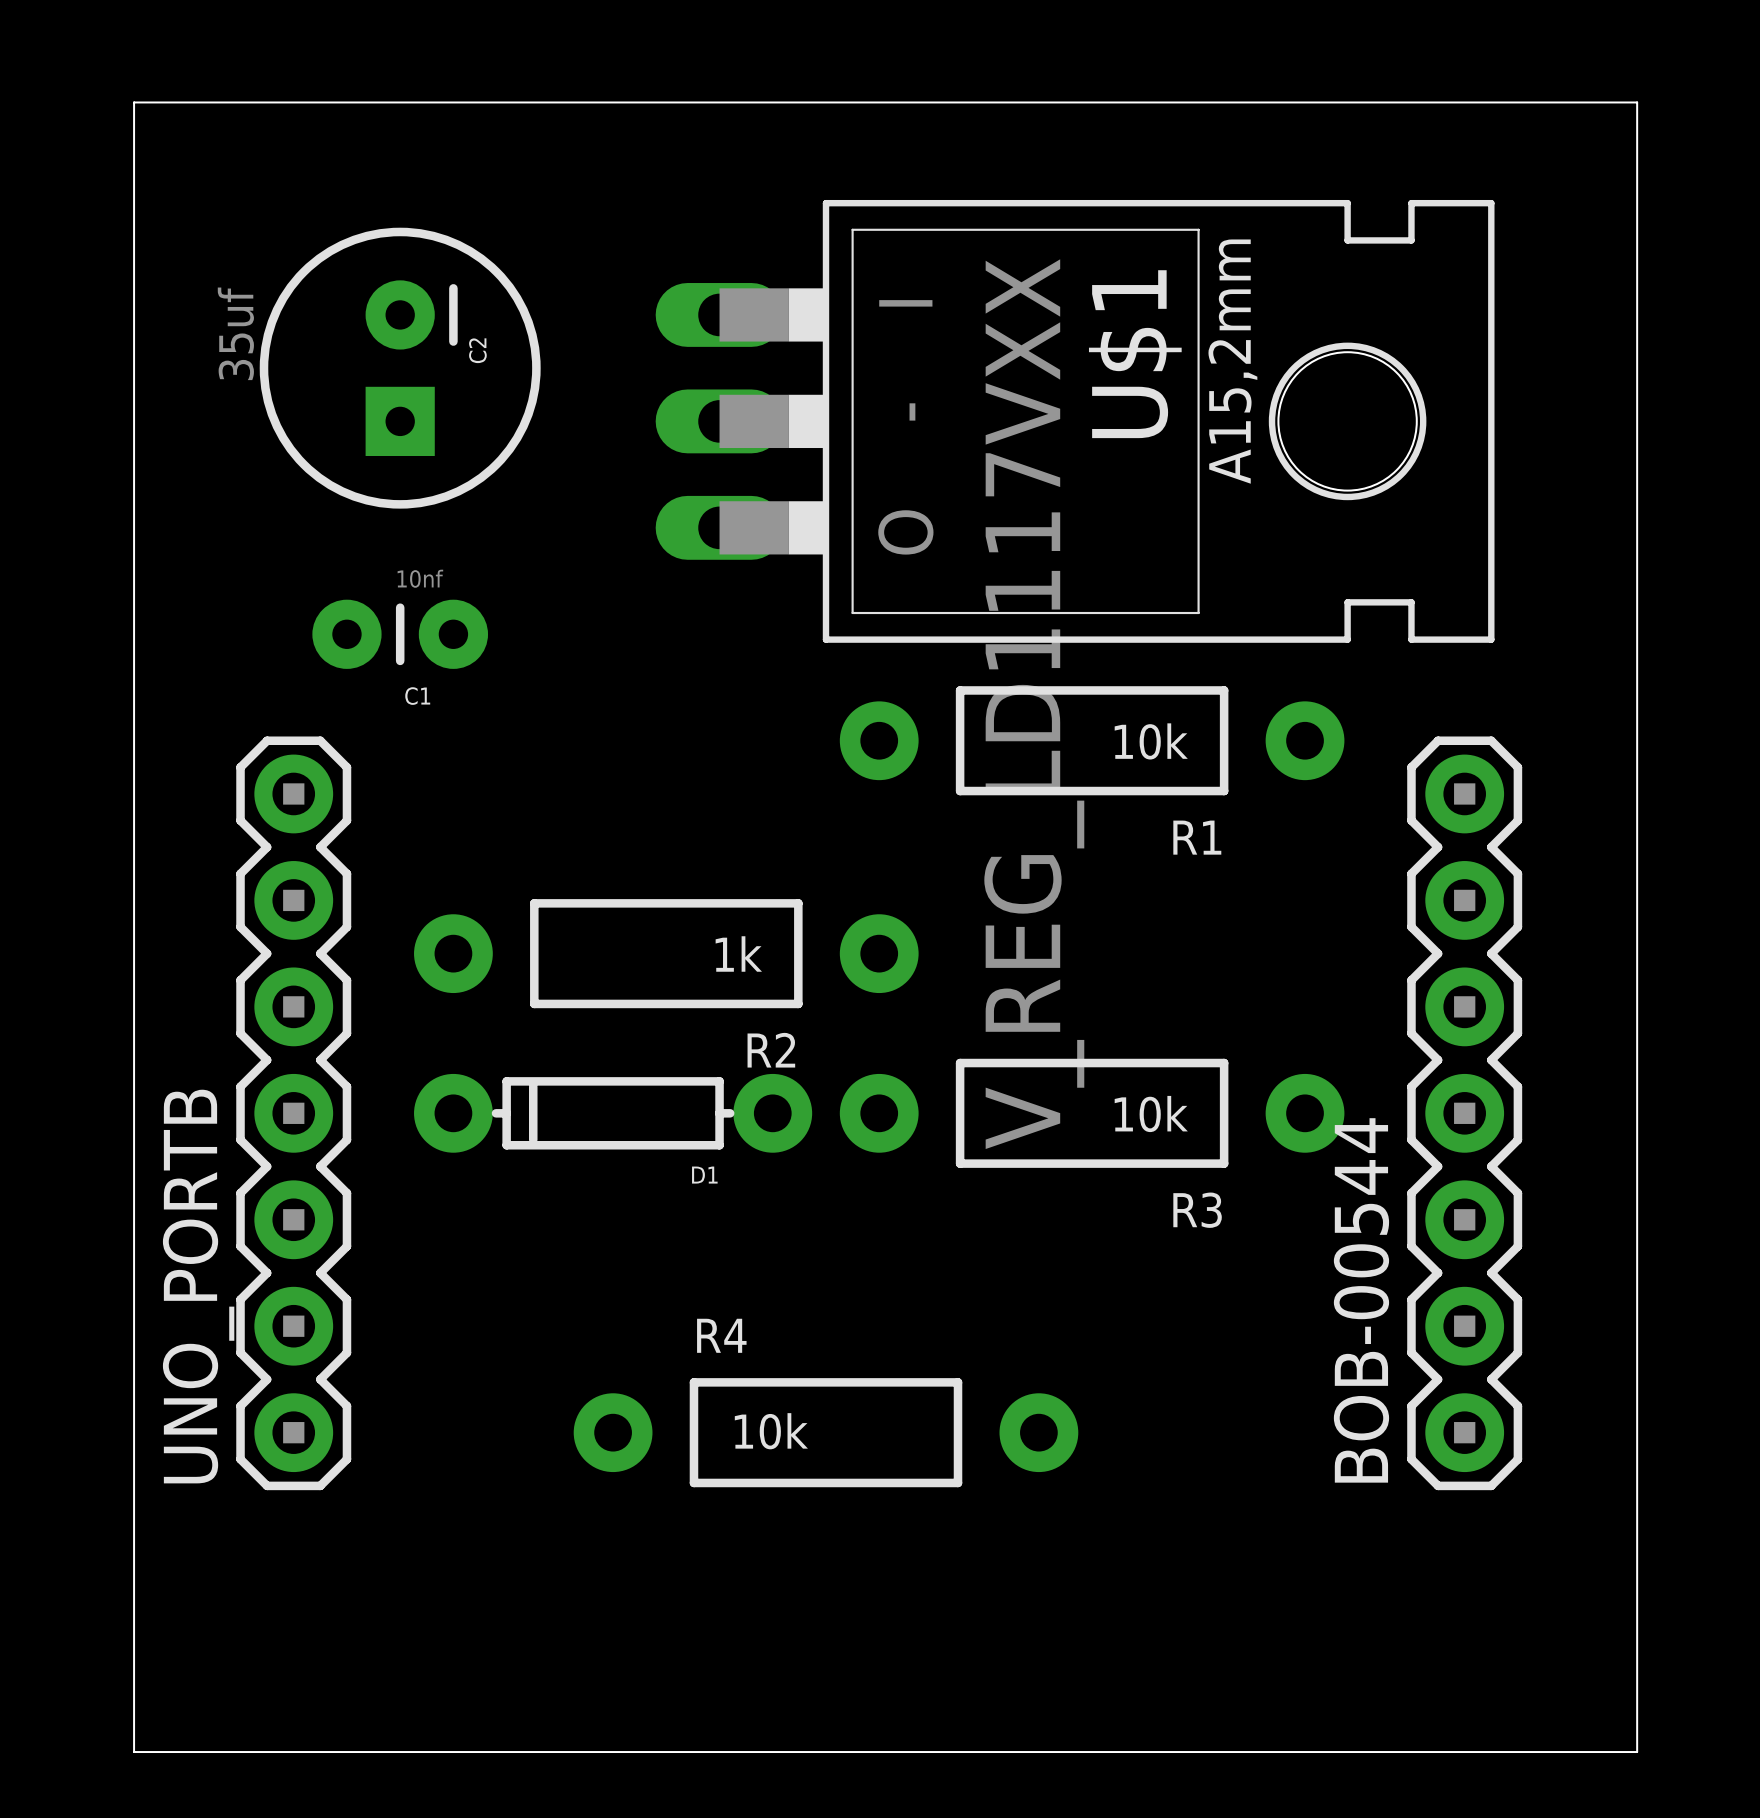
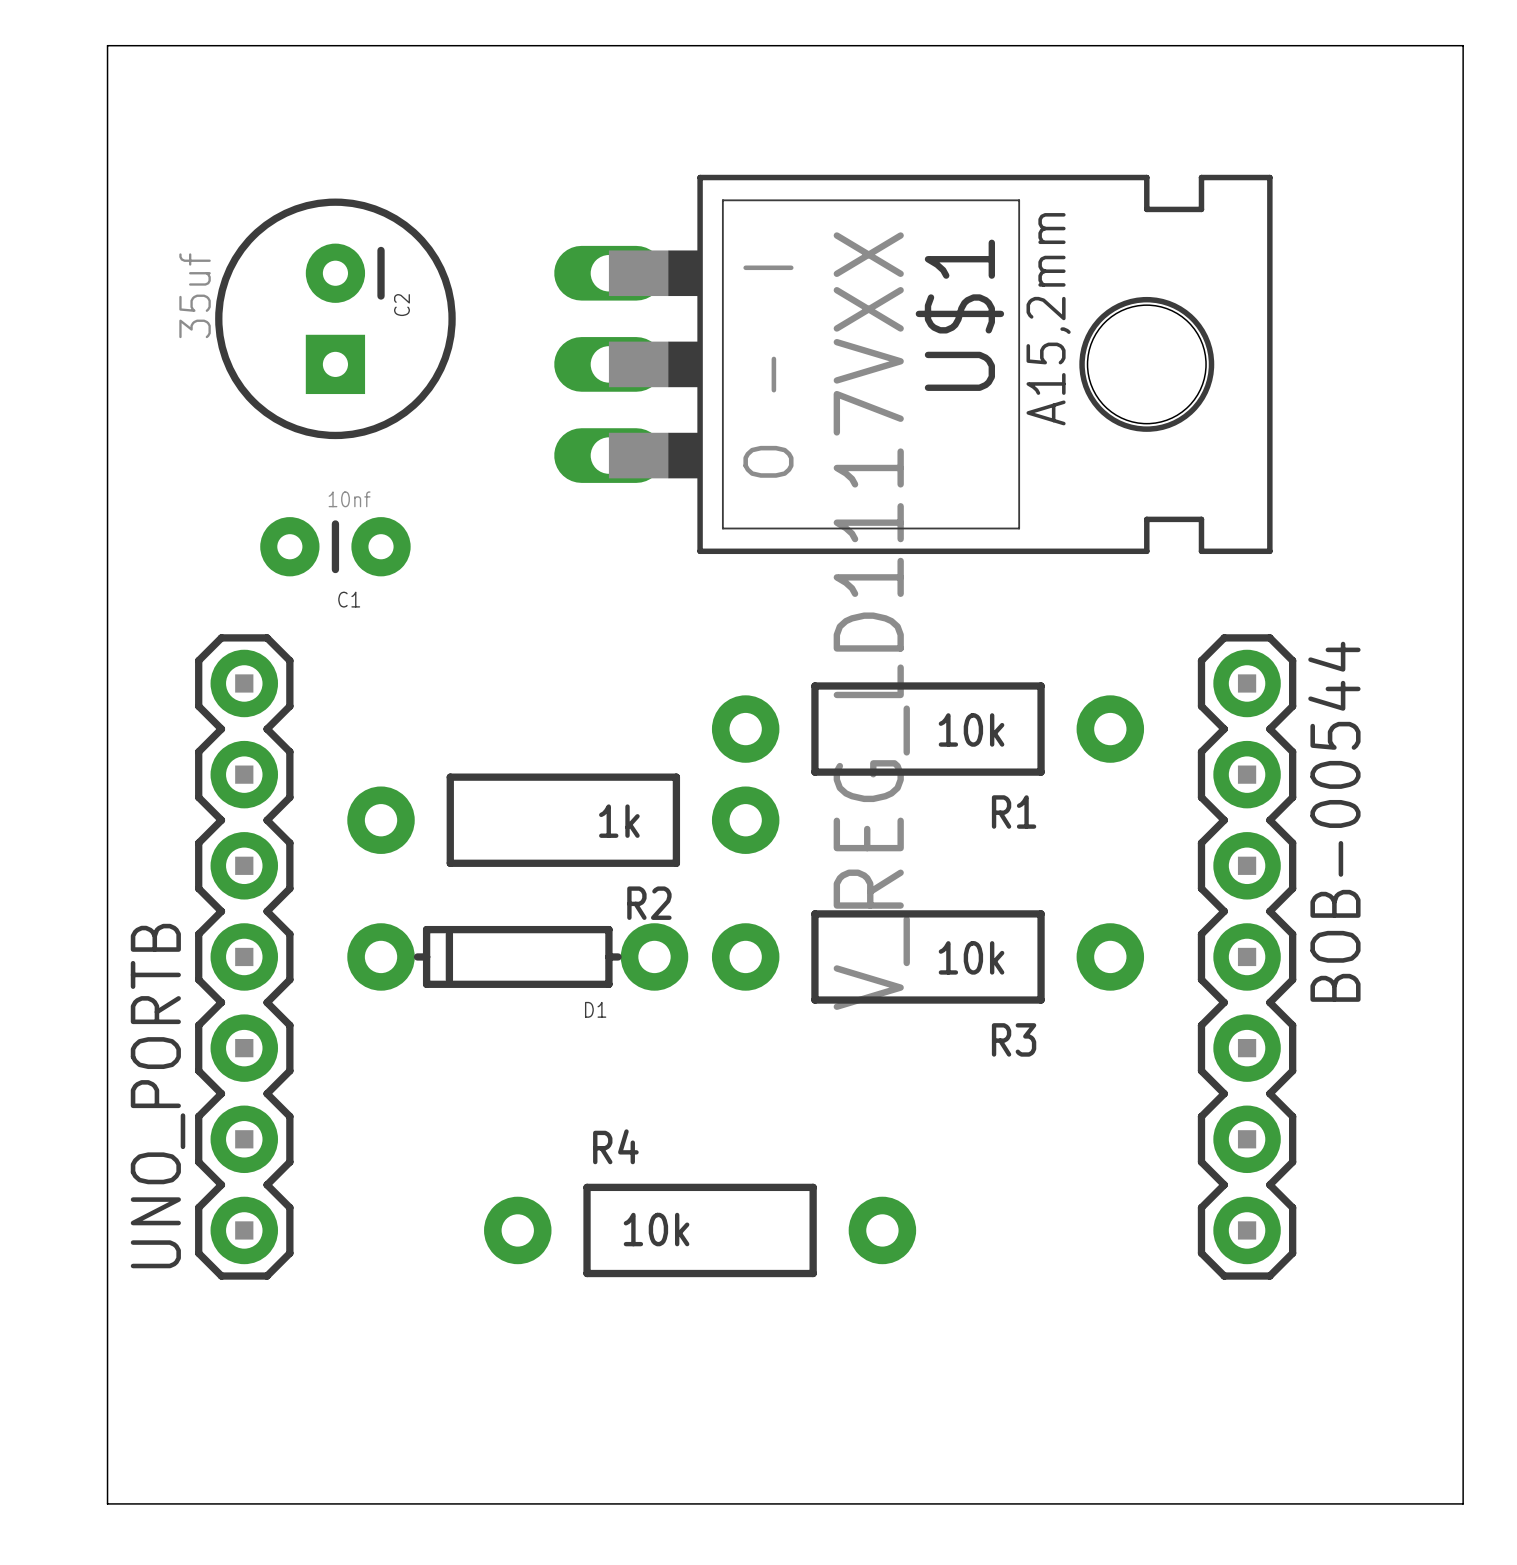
board edge: (134, 102) (1637, 102) (1637, 1752) -> (107, 91) (107, 45) (1463, 45) (1463, 1503) (1394, 1503)
R1 position: (1092, 740) -> (927, 729)
BOB-00544 name position: BOB-00544 (1361, 1300) -> BOB-00544 (1334, 821)

